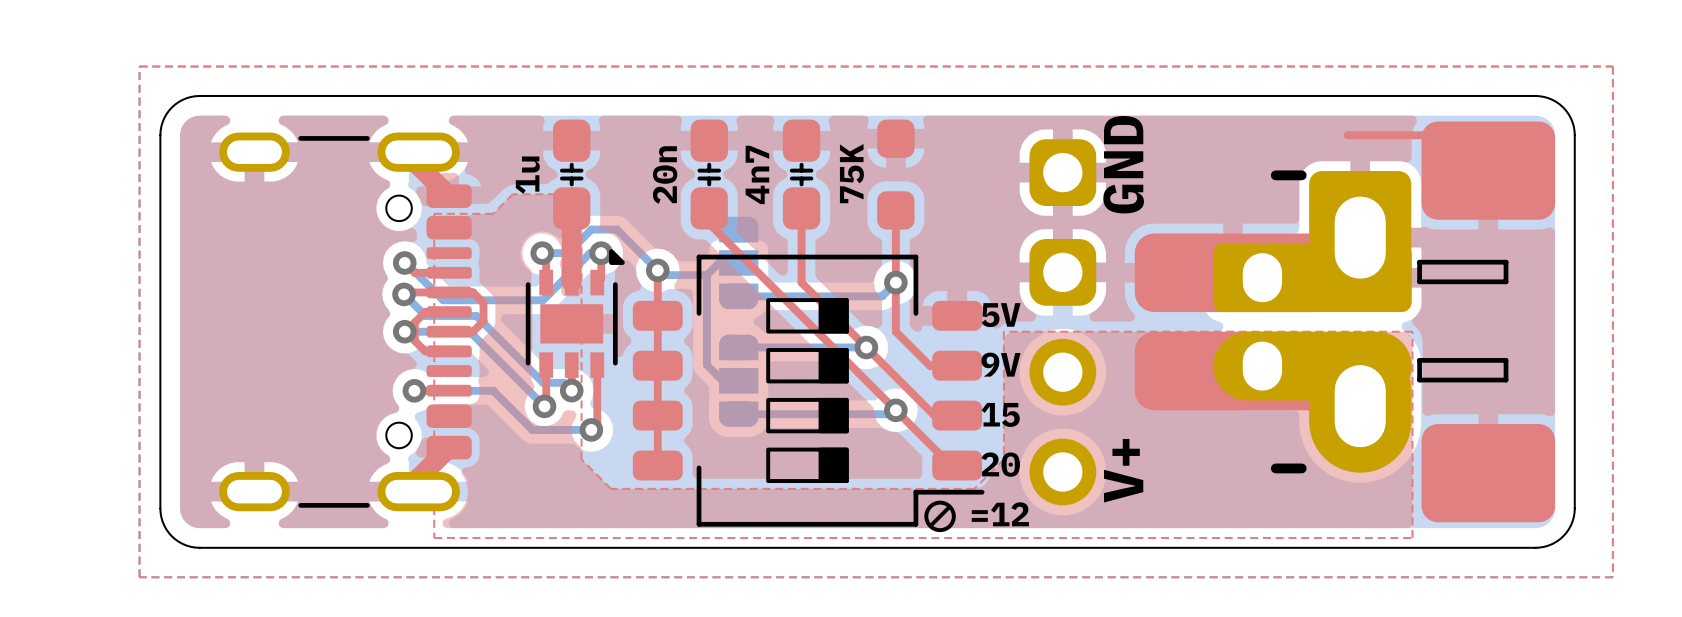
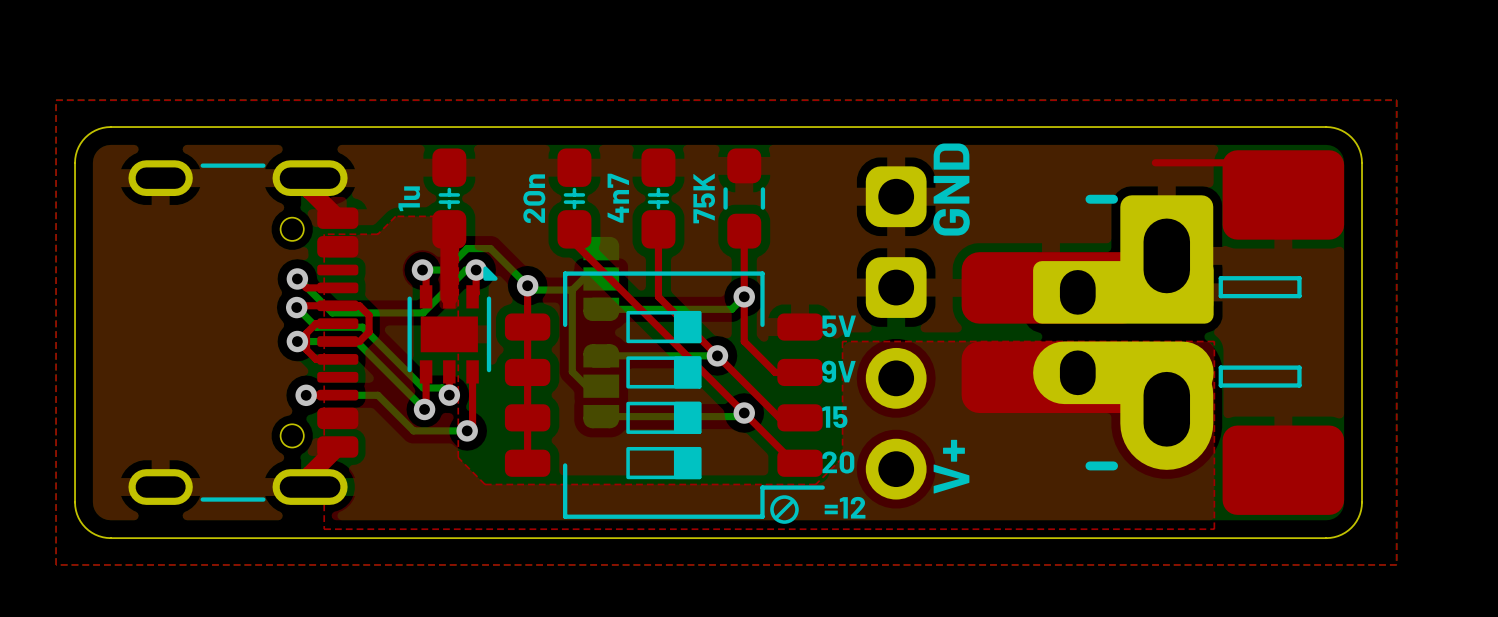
part footprint: [877, 119, 915, 230] -> [723, 148, 766, 249]

